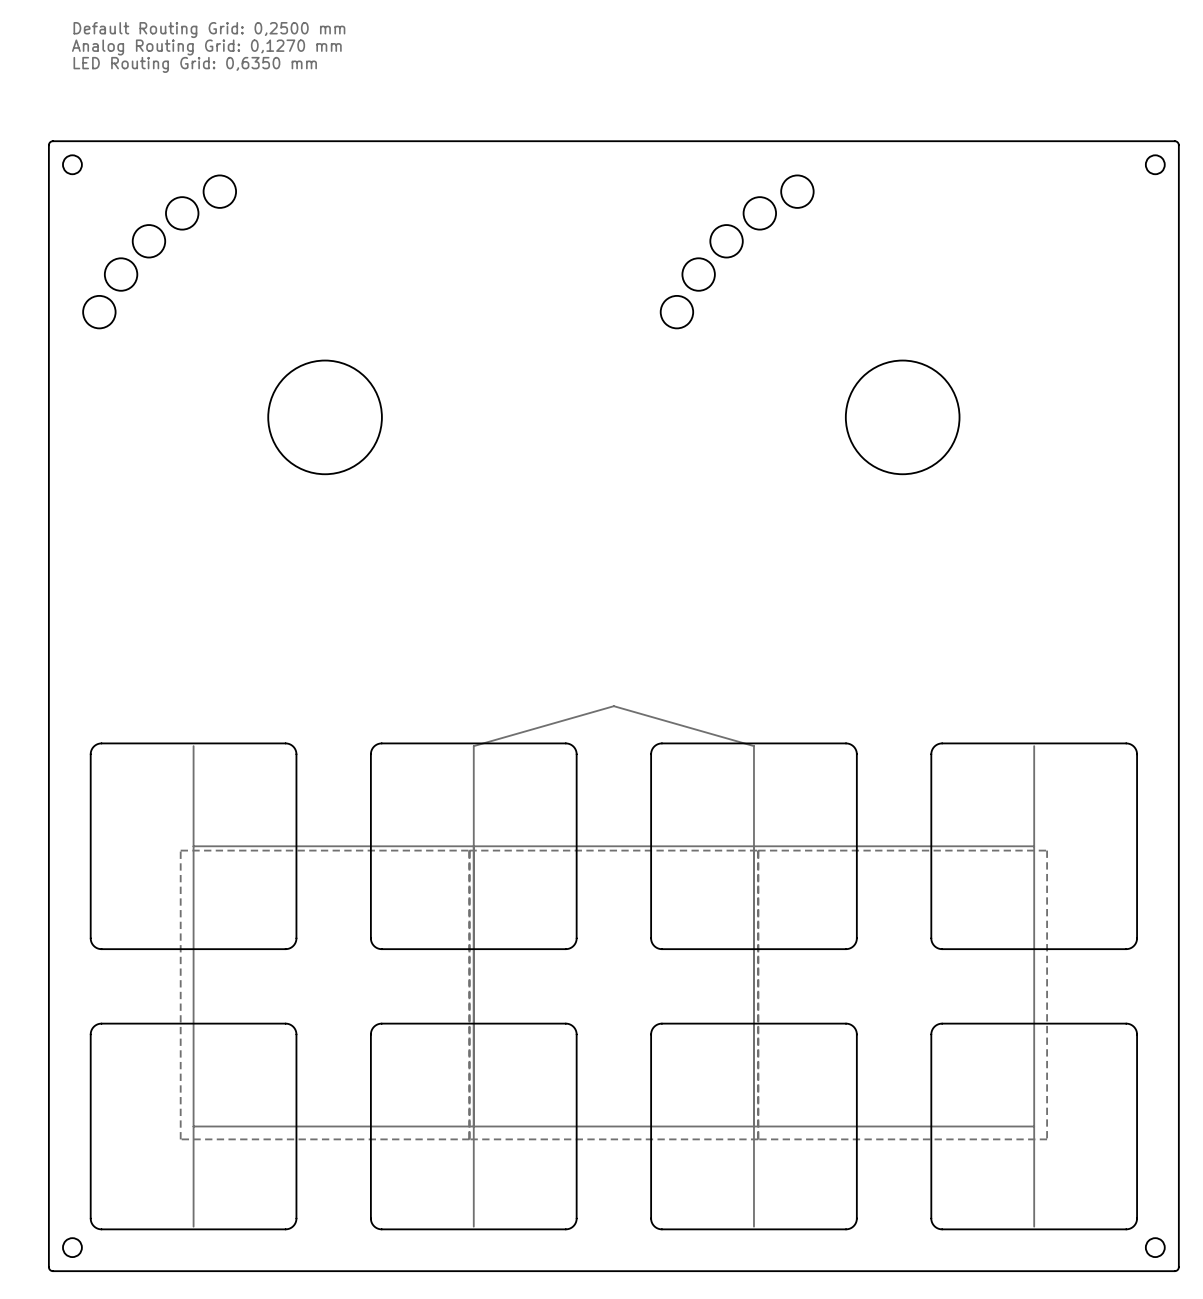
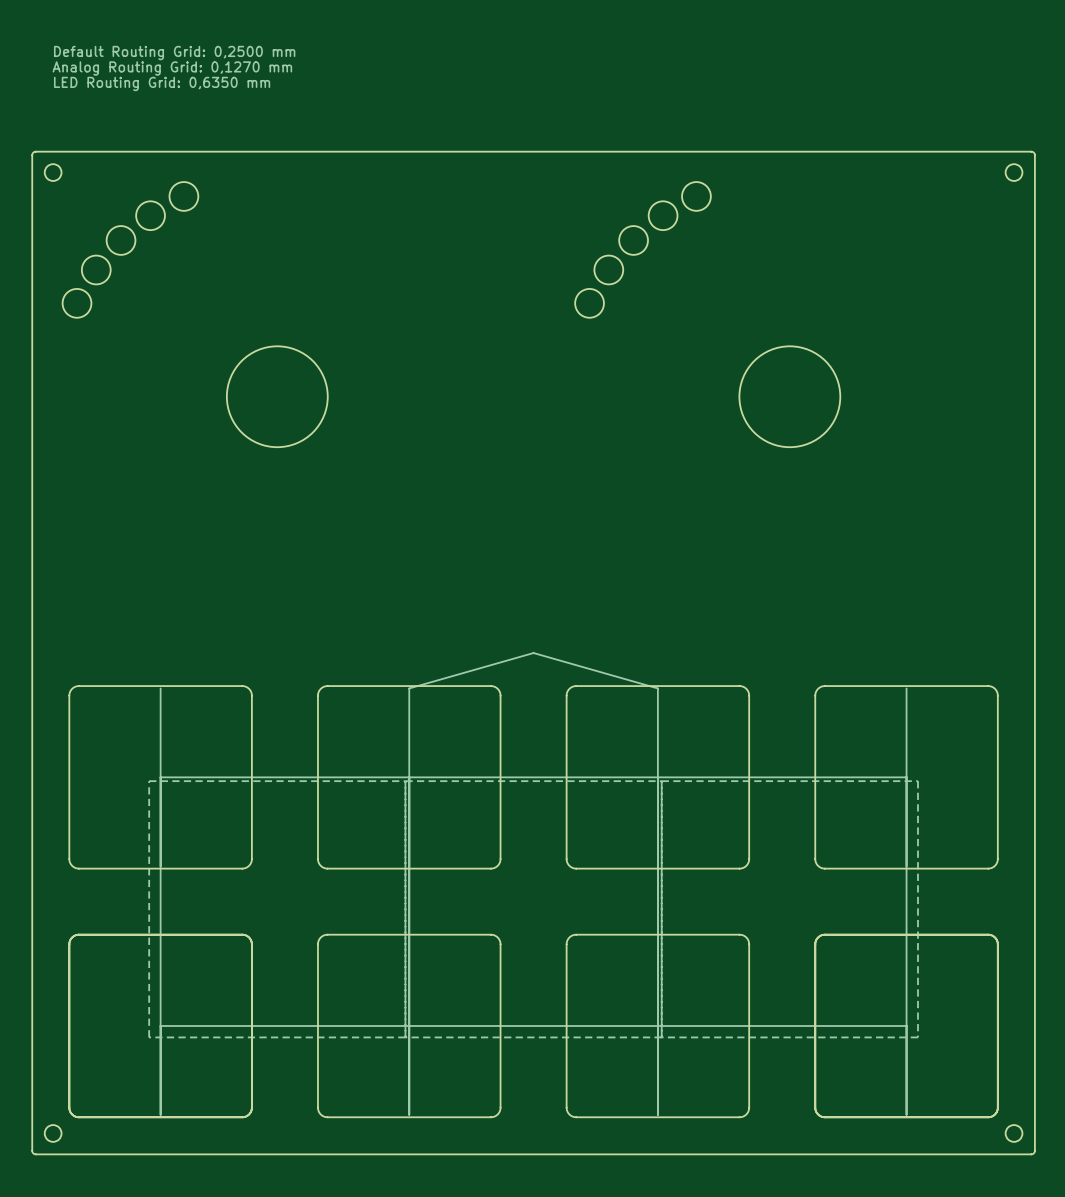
drawing: none -> [31, 151, 1036, 1155]

